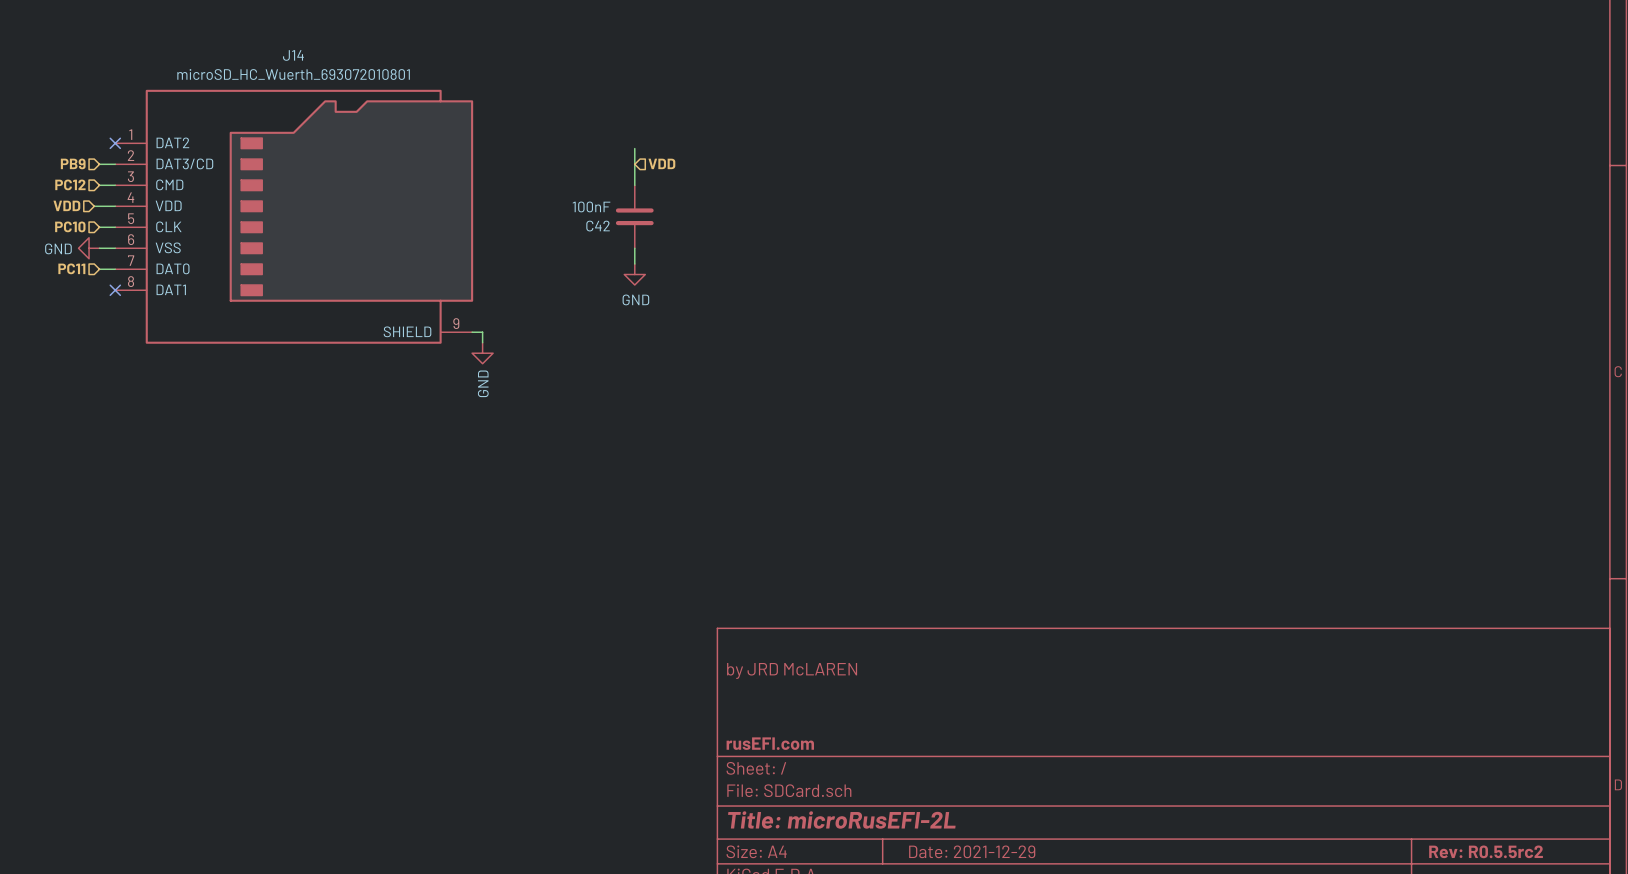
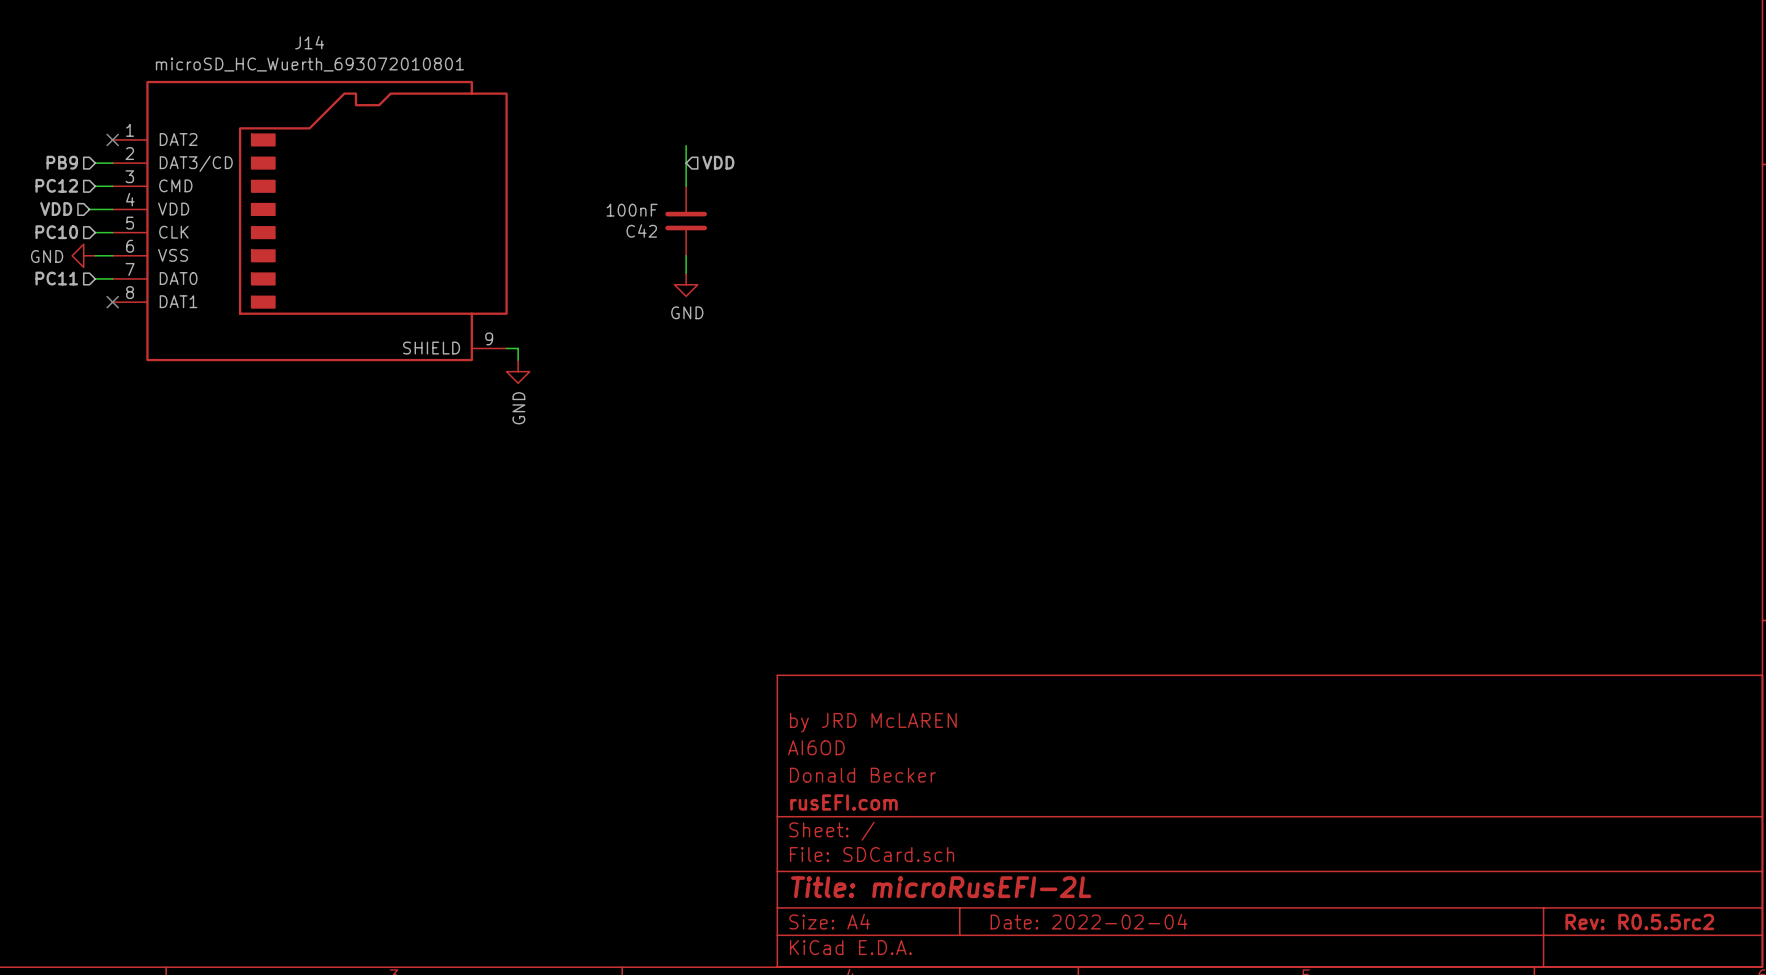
title block: none -> AI6OD (816, 747)
title block: none -> Donald Becker (862, 775)
title block: Date: 2021-12-29 (972, 851) -> Date: 2022-02-04 (1089, 921)

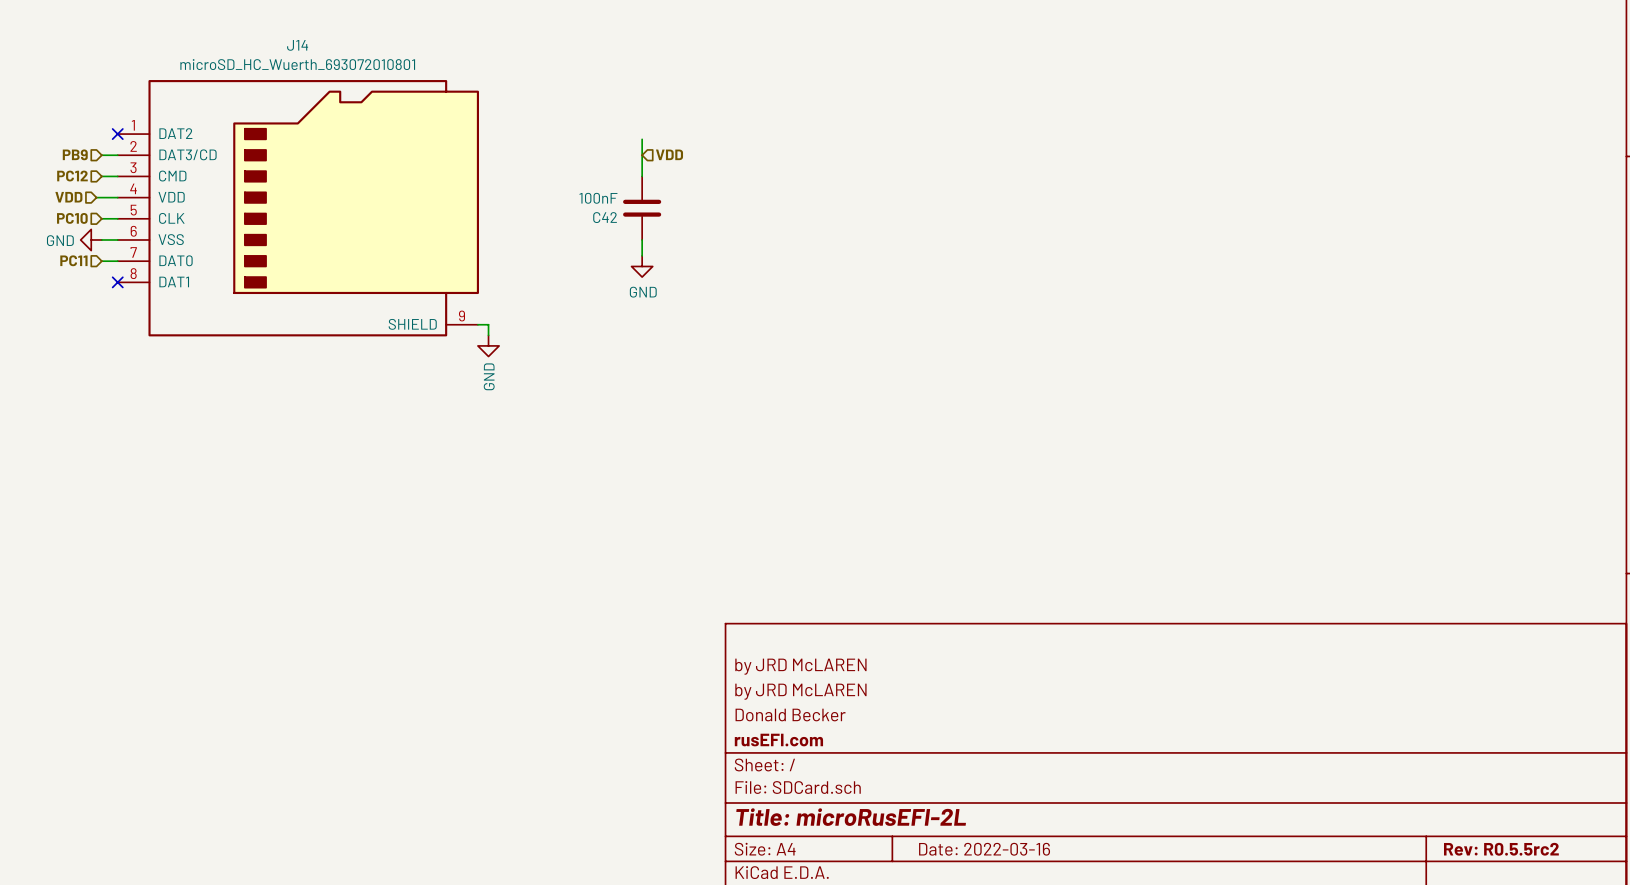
title block: AI6OD (816, 747) -> by JRD McLAREN (800, 691)
title block: Date: 2022-02-04 (1089, 921) -> Date: 2022-03-16 (984, 849)

